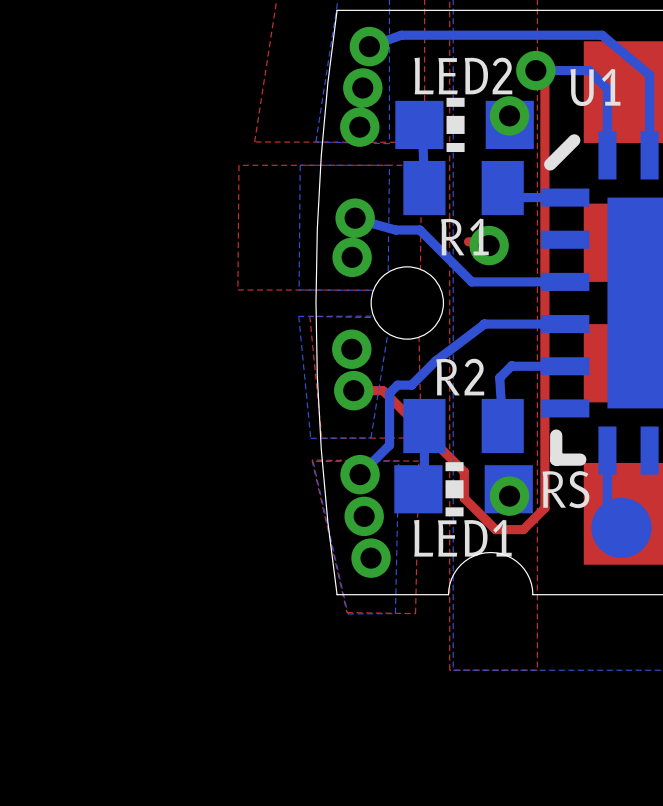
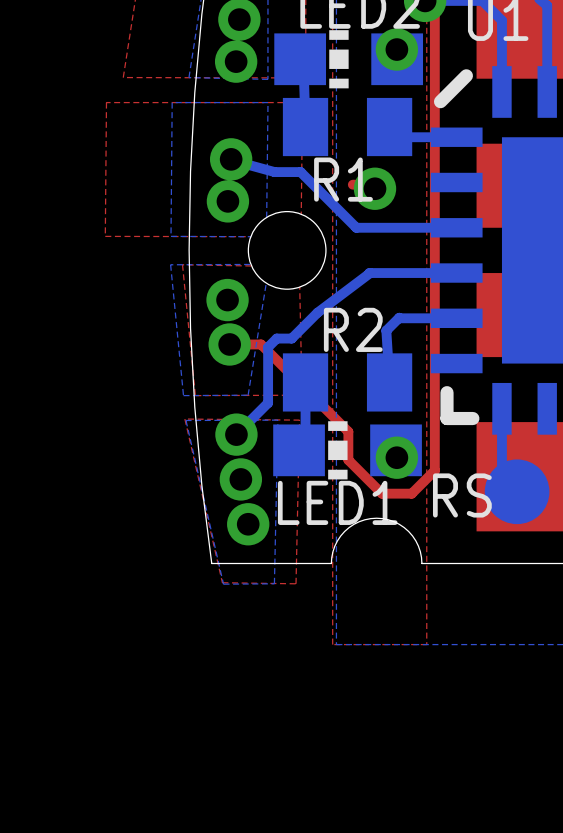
RS name position: RS (565, 489) -> RS (462, 495)

